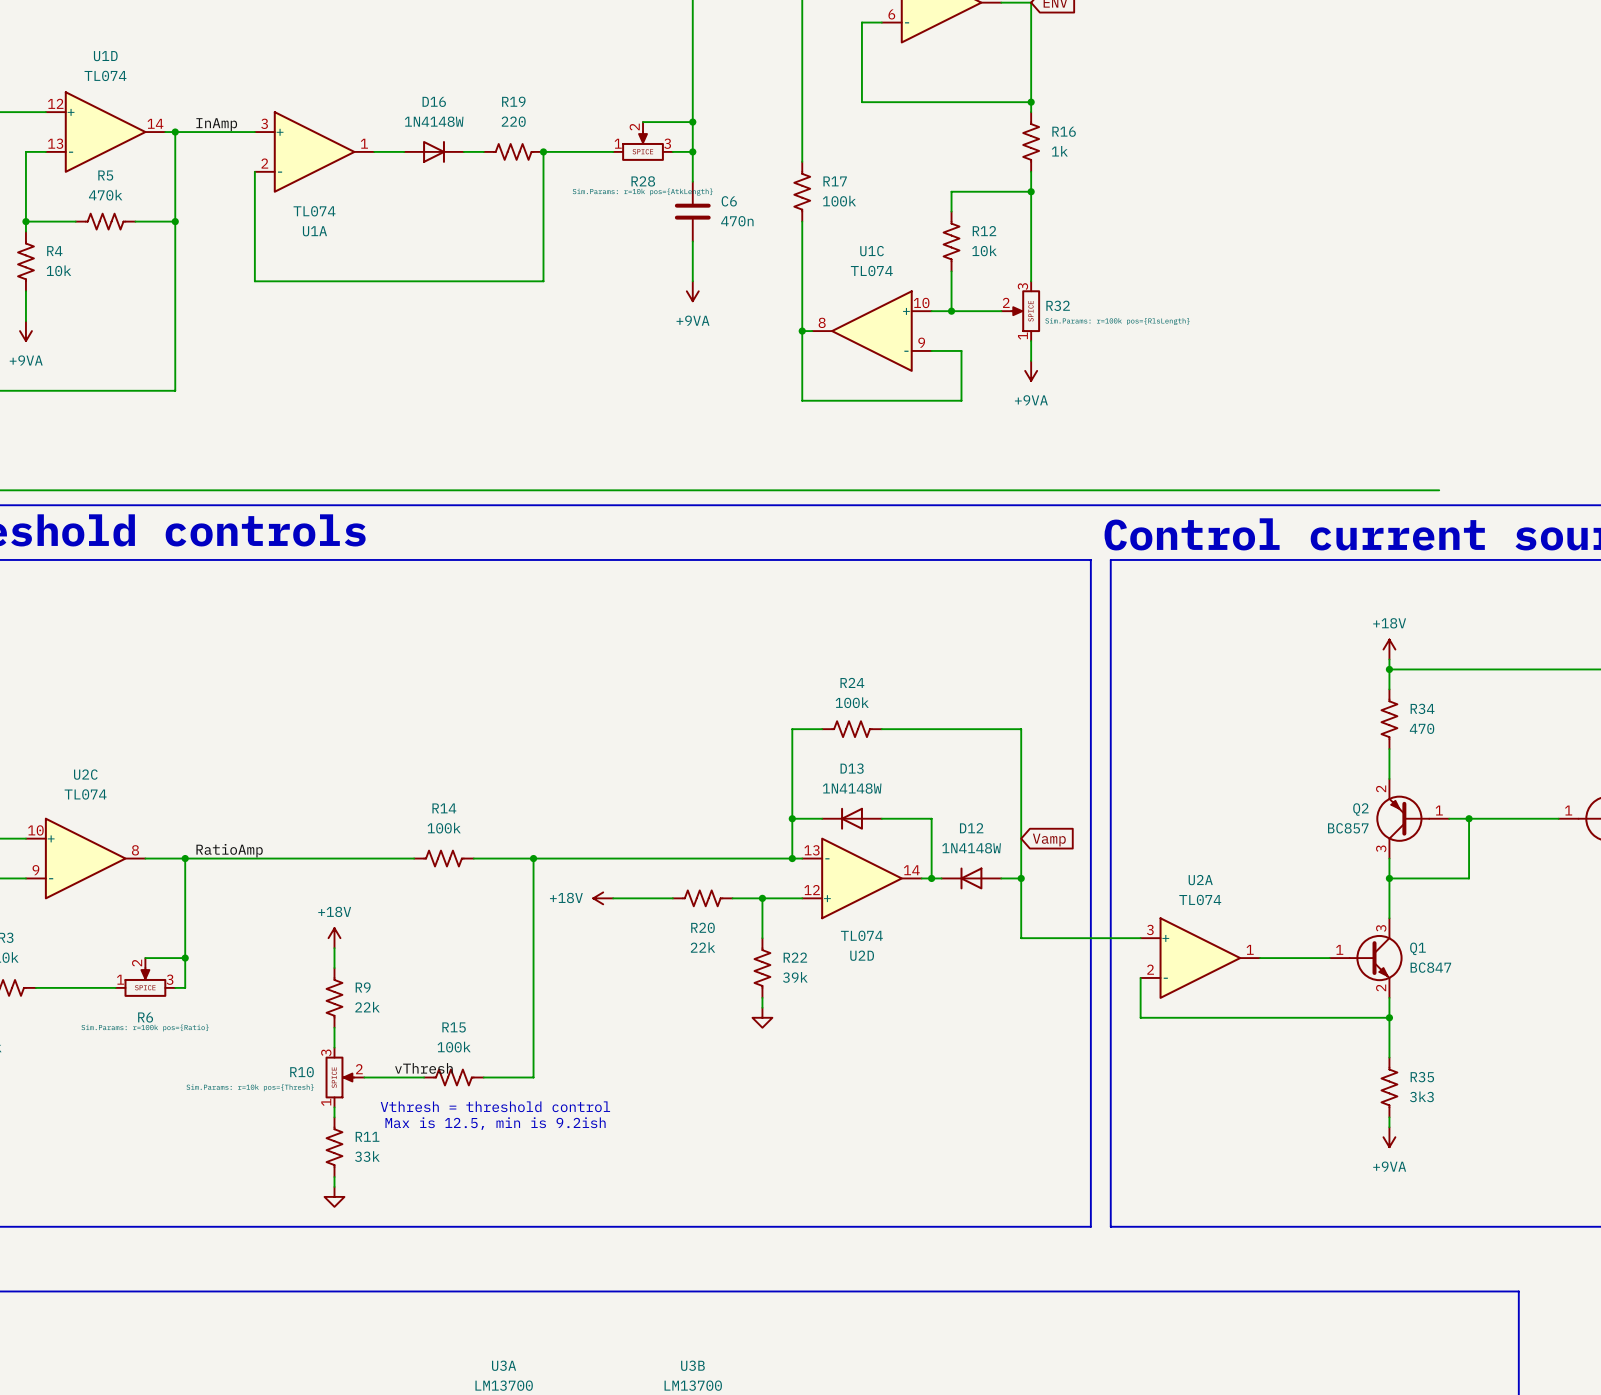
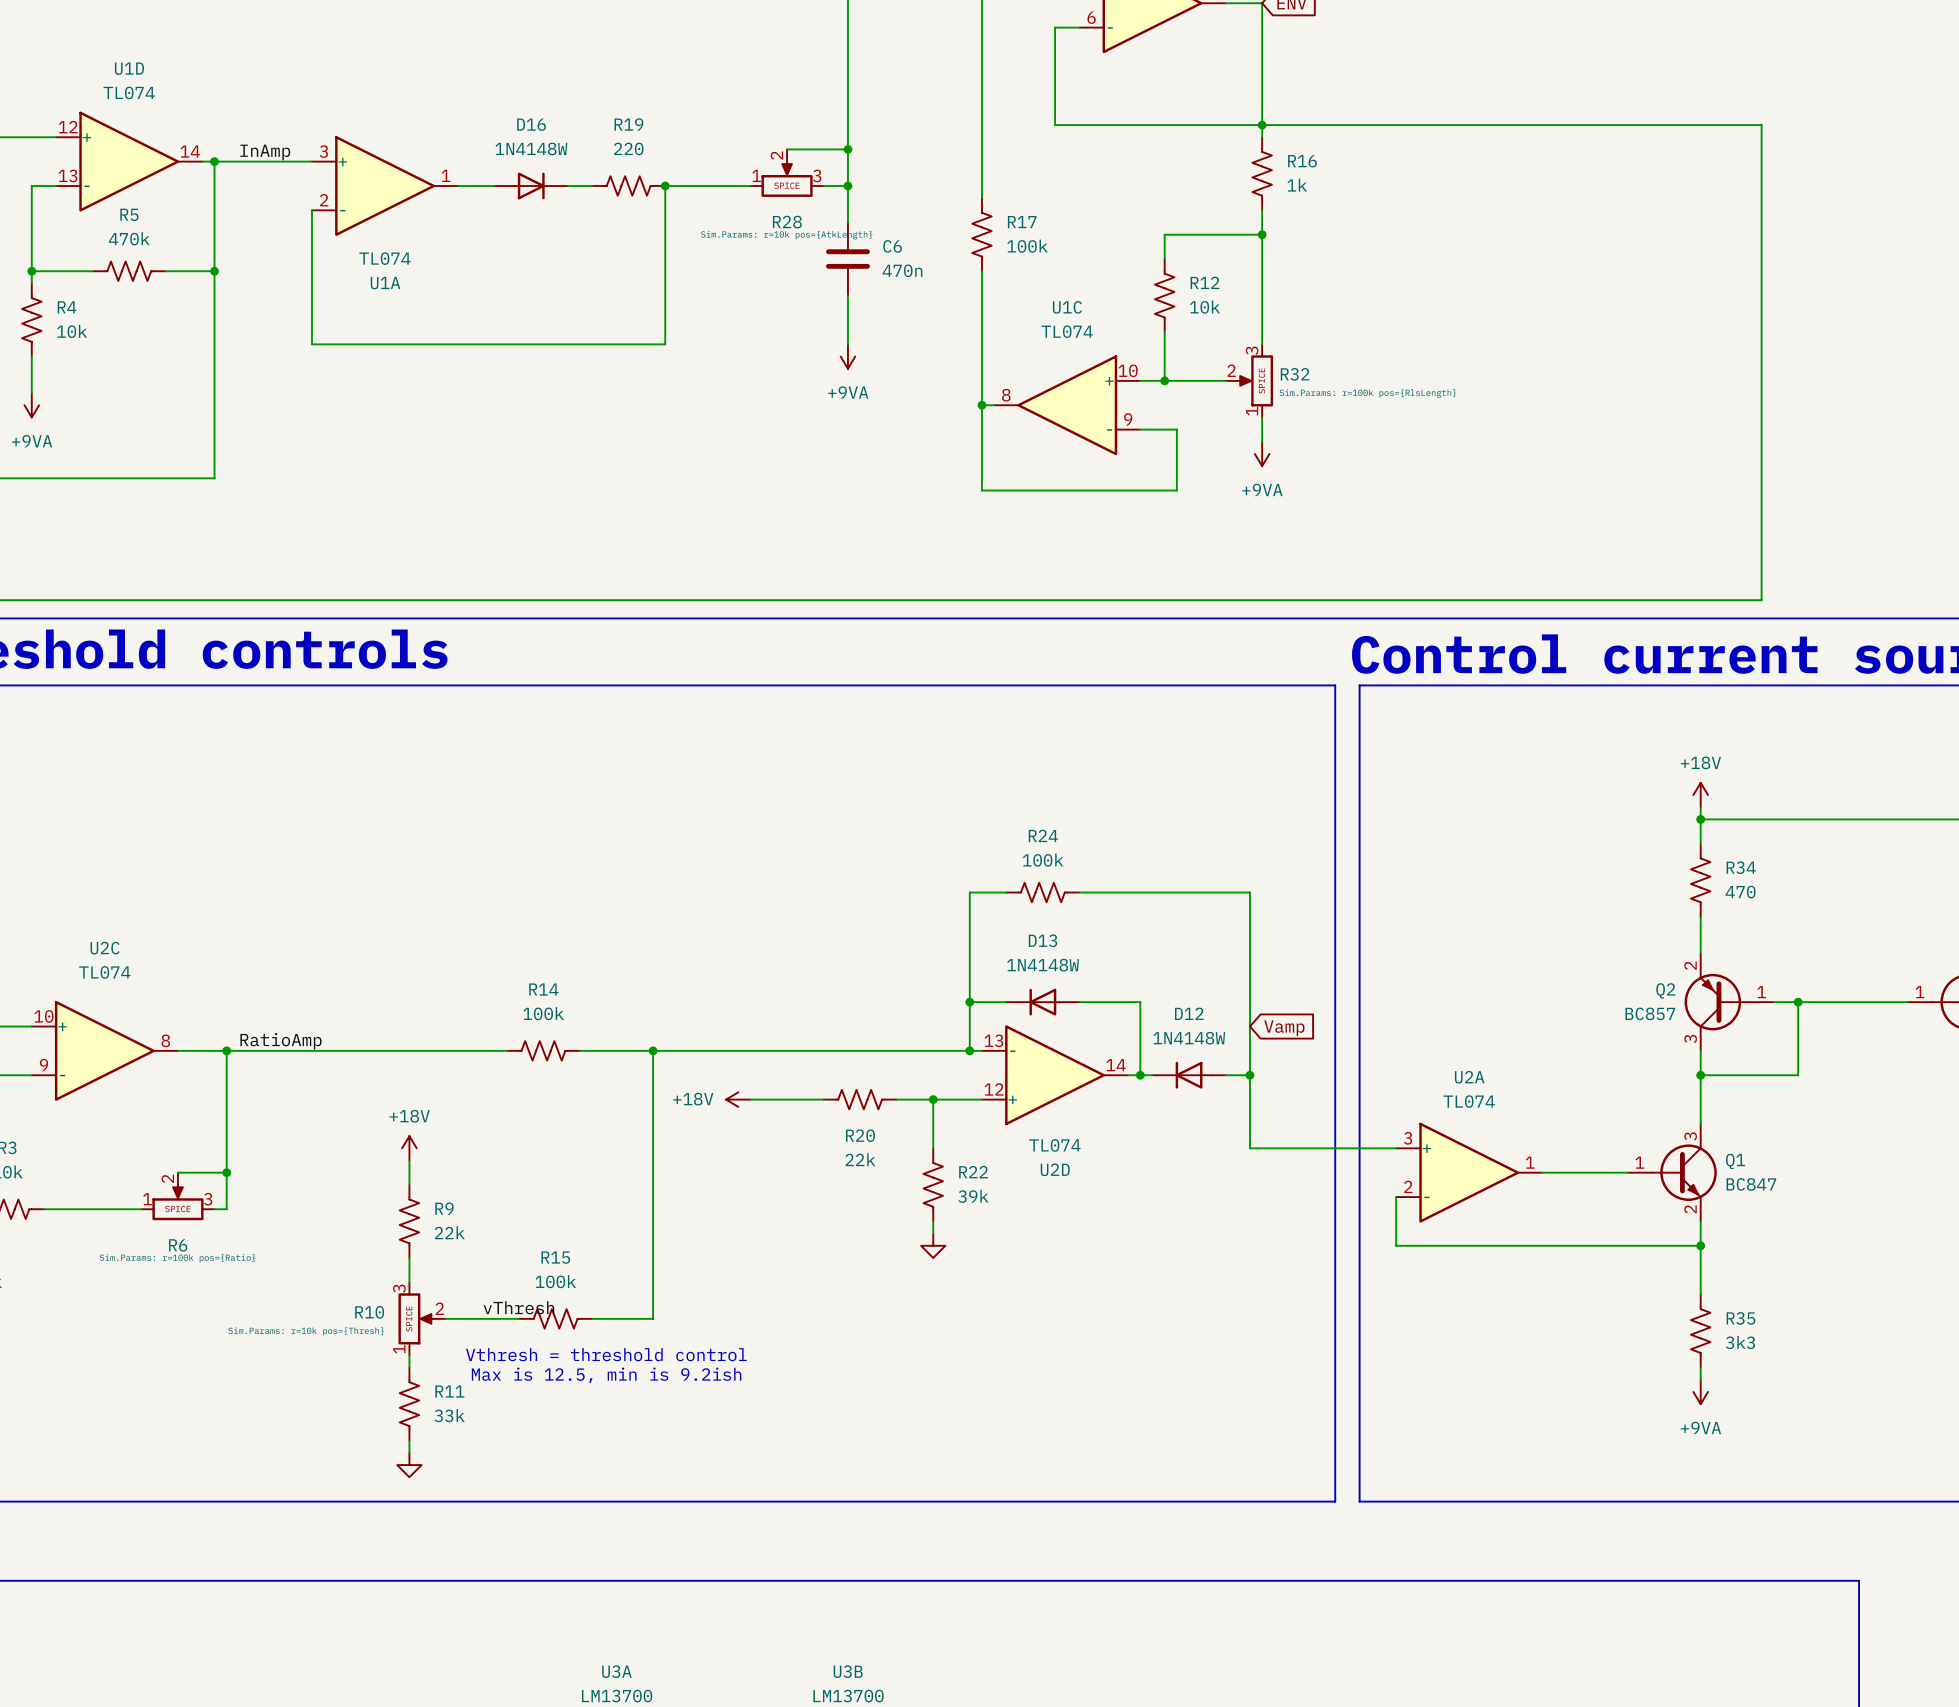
wire: none -> (1262, 125) (1761, 125) (1761, 600)

